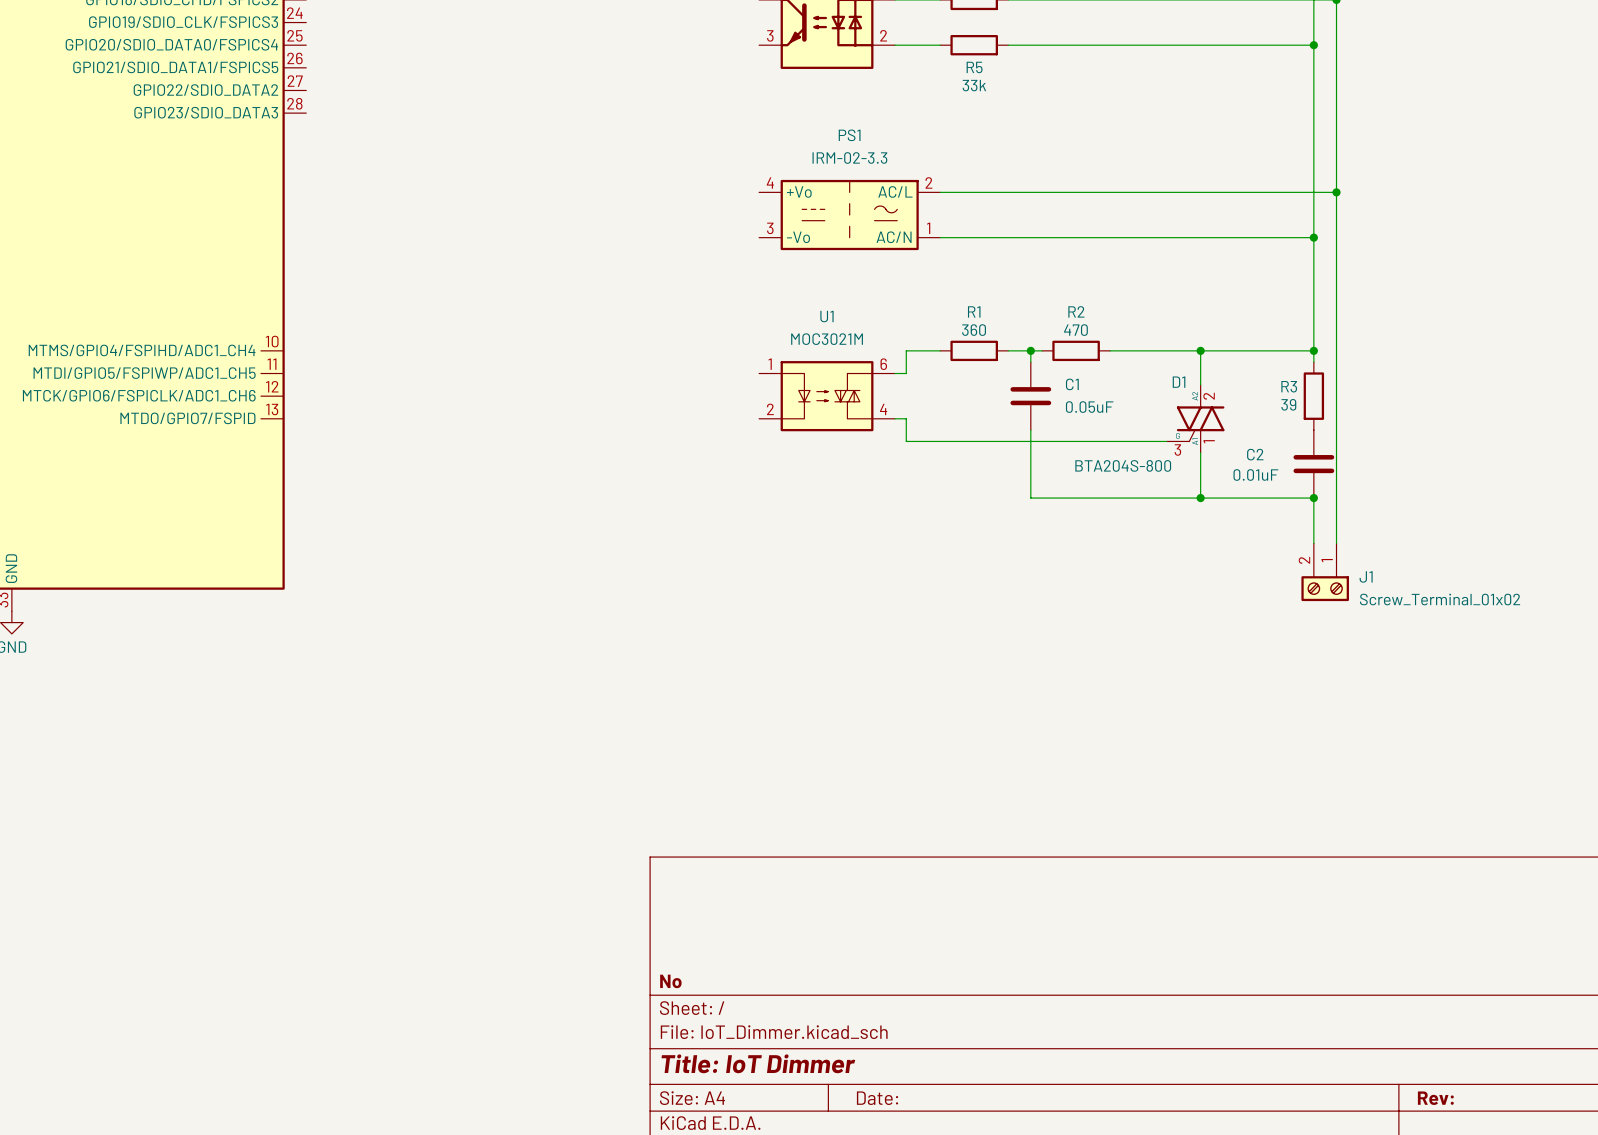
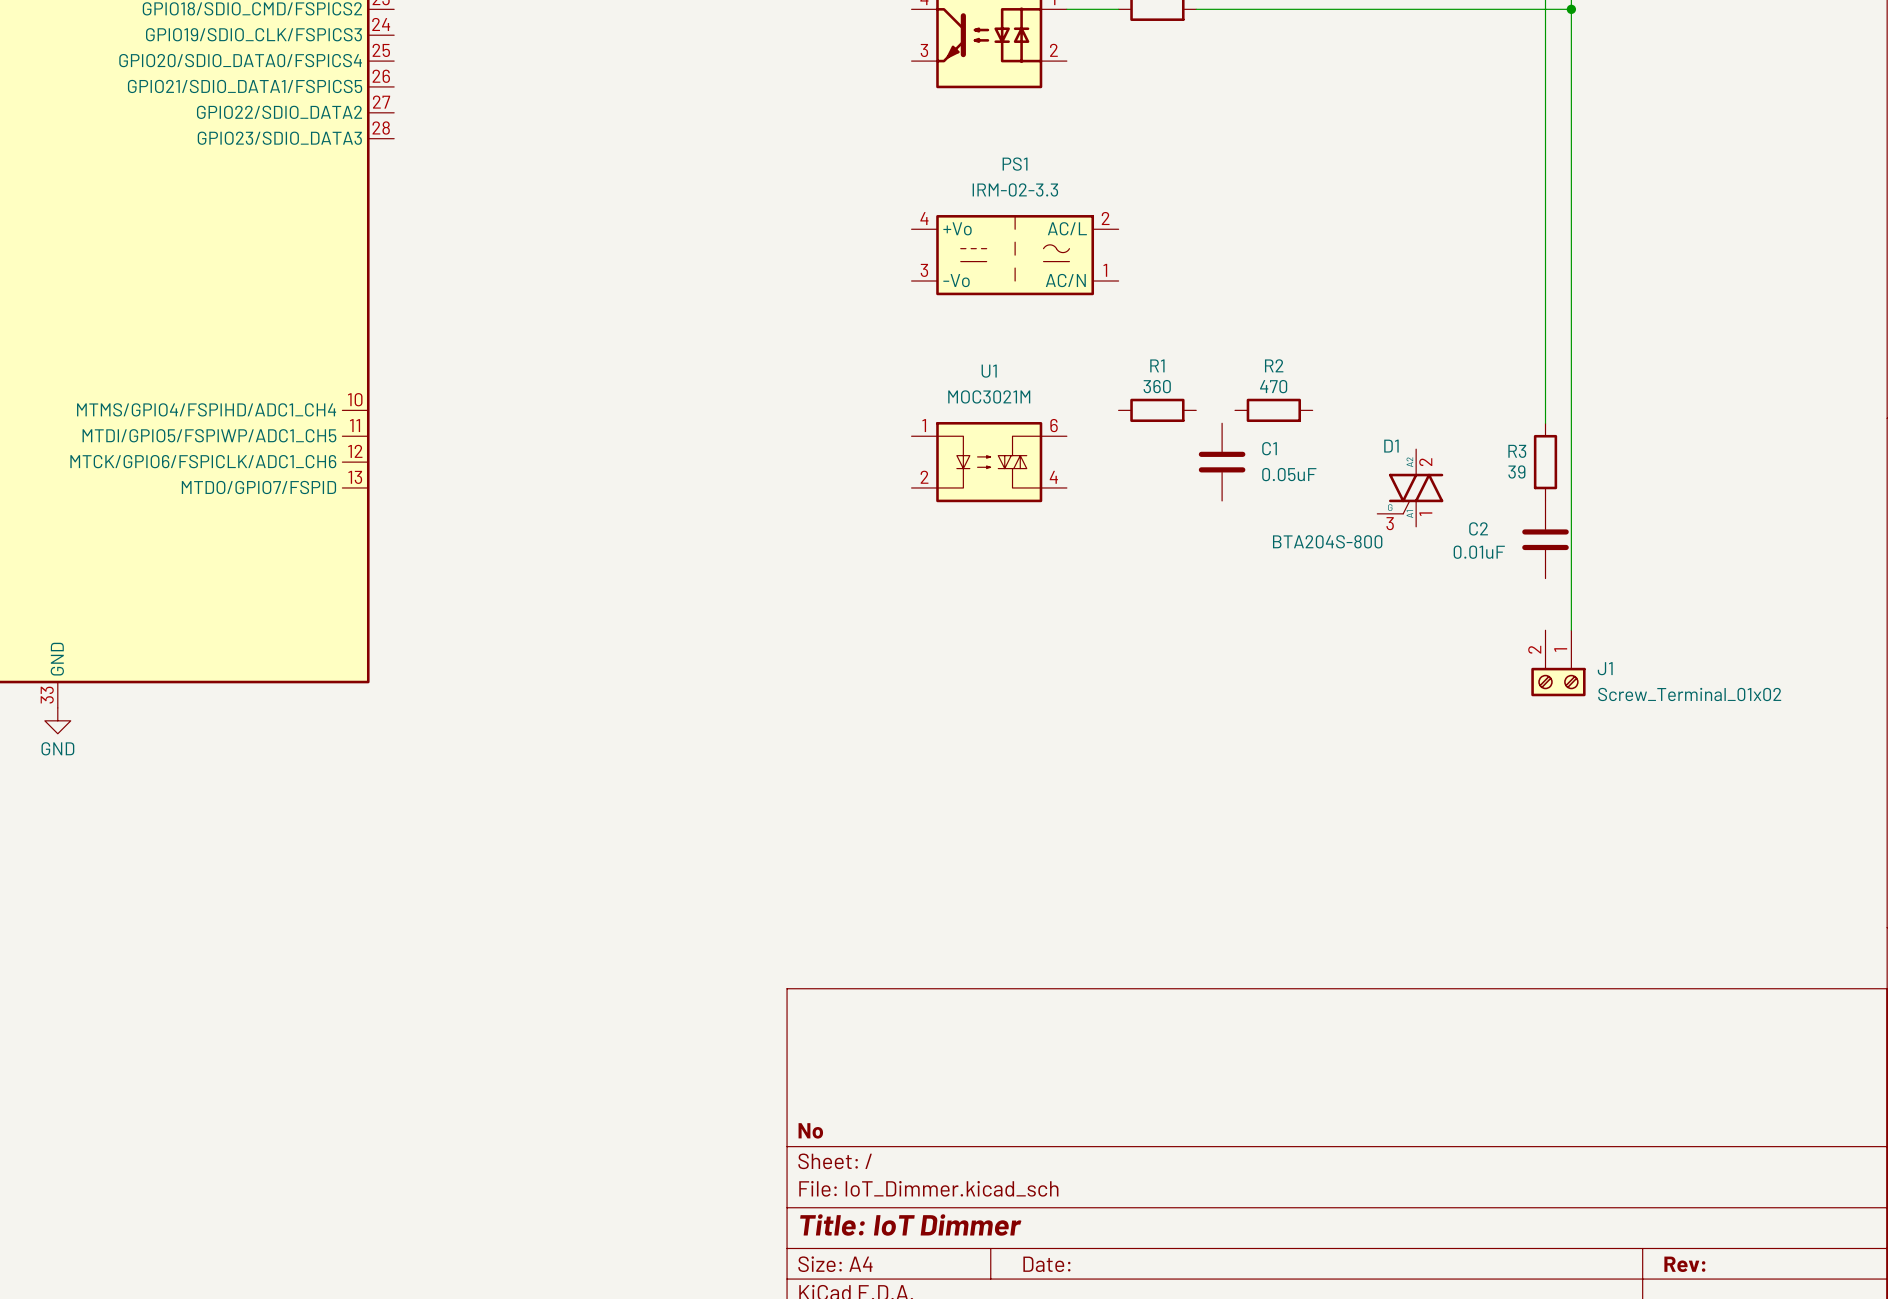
wire: (894, 45) (940, 45) -> none
R5: 33k (974, 45) -> none
wire: (1008, 45) (1313, 45) -> none
junction: (1313, 45) -> none
wire: (940, 192) (1336, 192) -> none
junction: (1336, 192) -> none
wire: (940, 237) (1313, 237) -> none
junction: (1313, 237) -> none
wire: (940, 350) (906, 350) (906, 373) (894, 373) -> none
wire: (1008, 350) (1042, 350) -> none
wire: (1030, 350) (1030, 362) -> none
junction: (1030, 350) -> none
wire: (1110, 350) (1313, 350) -> none
wire: (1200, 350) (1200, 384) -> none
junction: (1200, 350) -> none
junction: (1313, 350) -> none
wire: (894, 418) (906, 418) (906, 441) (1166, 441) -> none
wire: (1030, 430) (1030, 498) (1313, 498) (1313, 543) -> none
wire: (1200, 452) (1200, 498) -> none
junction: (1200, 498) -> none
junction: (1313, 498) -> none

